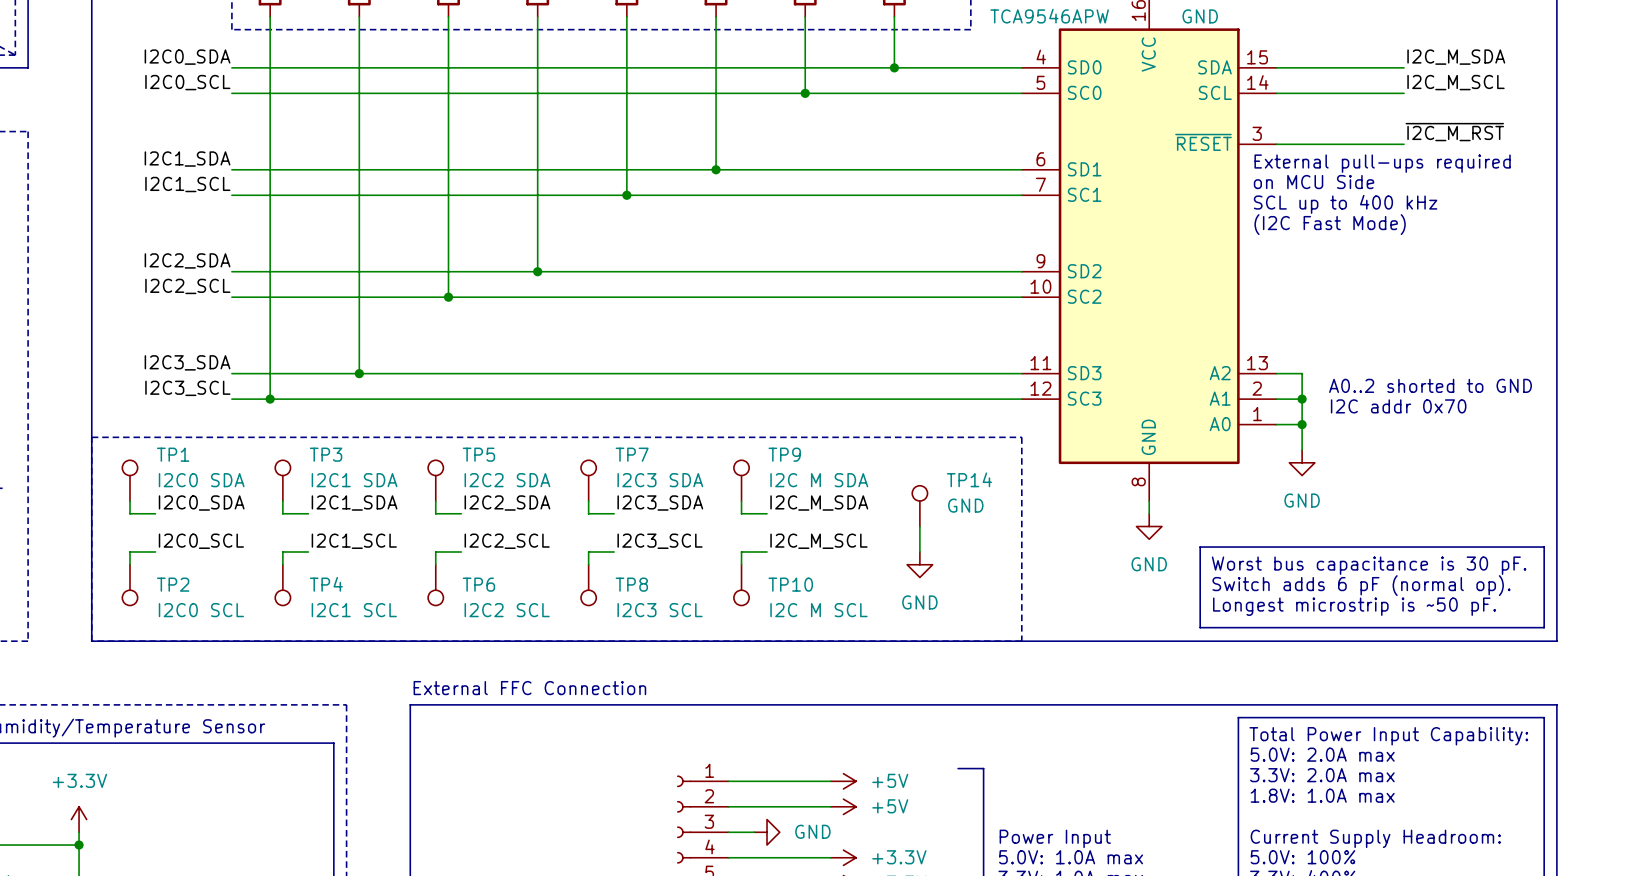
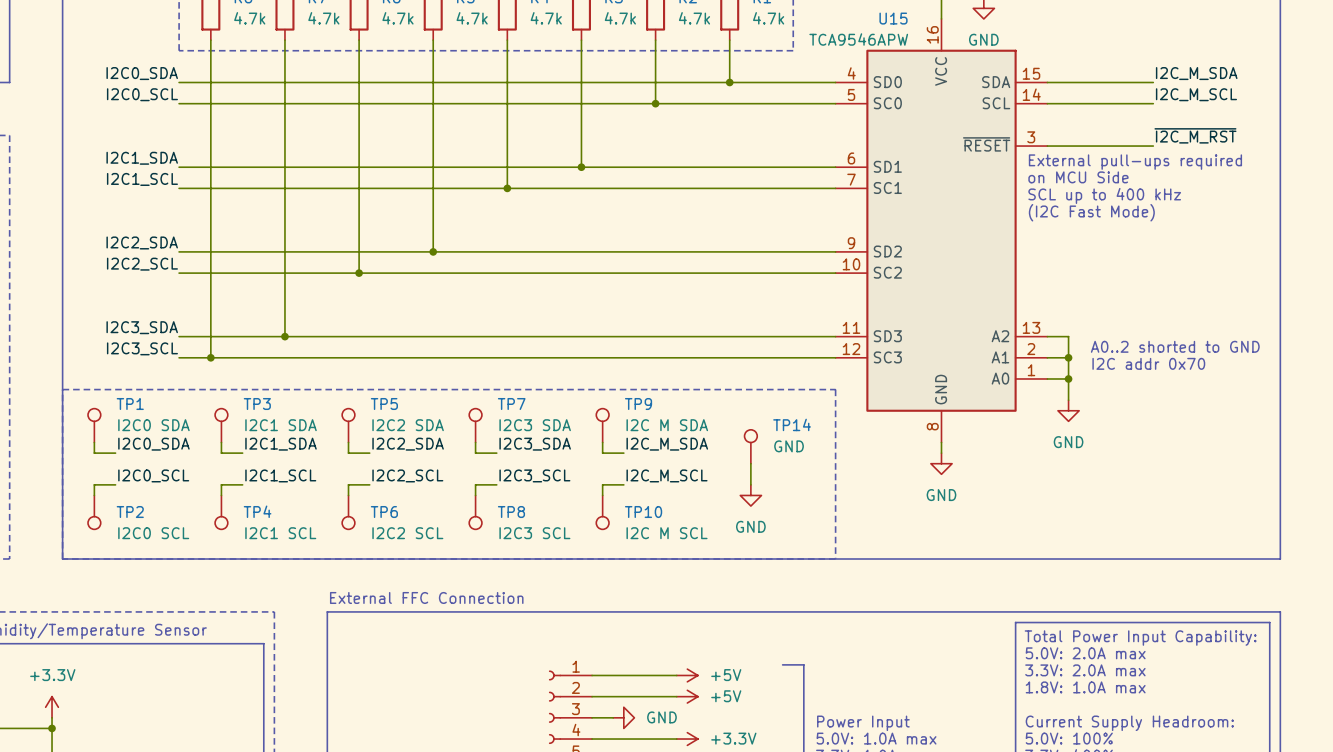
line: (1200, 547) (1544, 547) (1544, 627) (1200, 627) (1200, 547) -> none
text: Worst bus capacitance is 30 pF. (1369, 565) -> none
text: Switch adds 6 pF (normal op). (1361, 585) -> none
text: Longest microstrip is ~50 pF. (1354, 606) -> none

